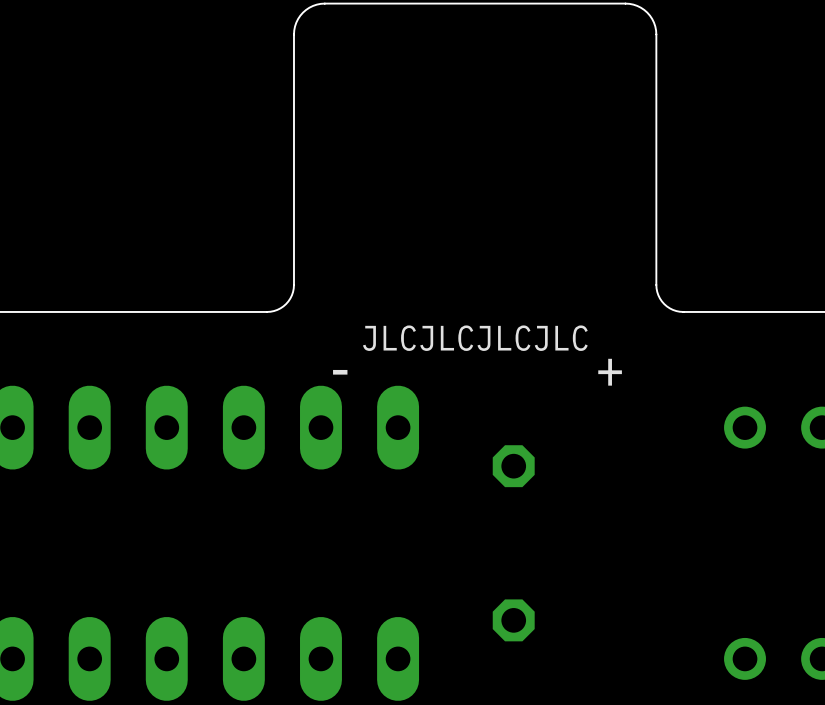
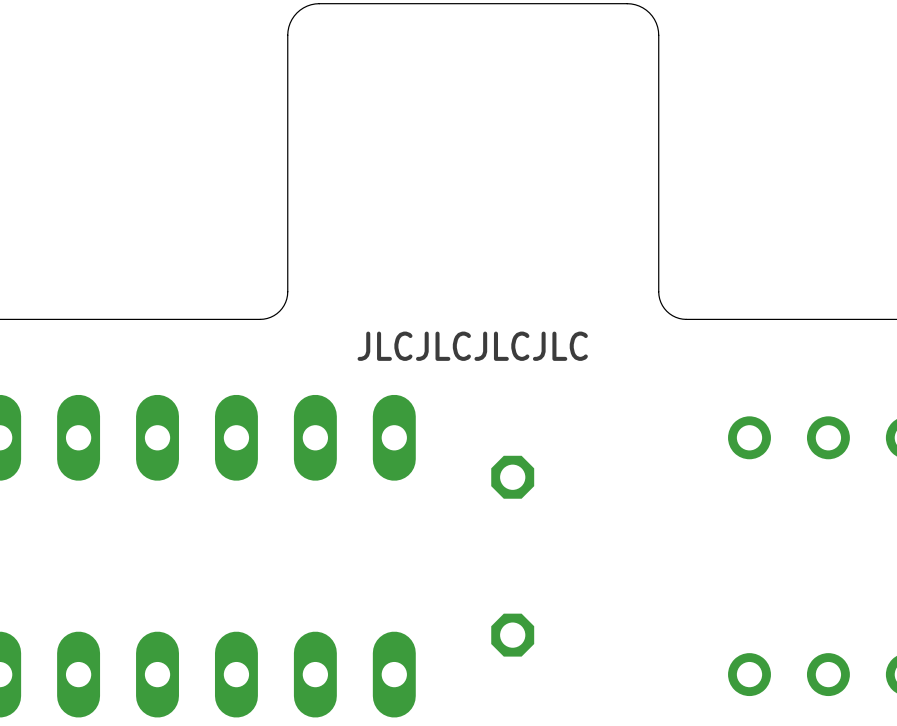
text: - (340, 372) -> none
text: + (610, 372) -> none

